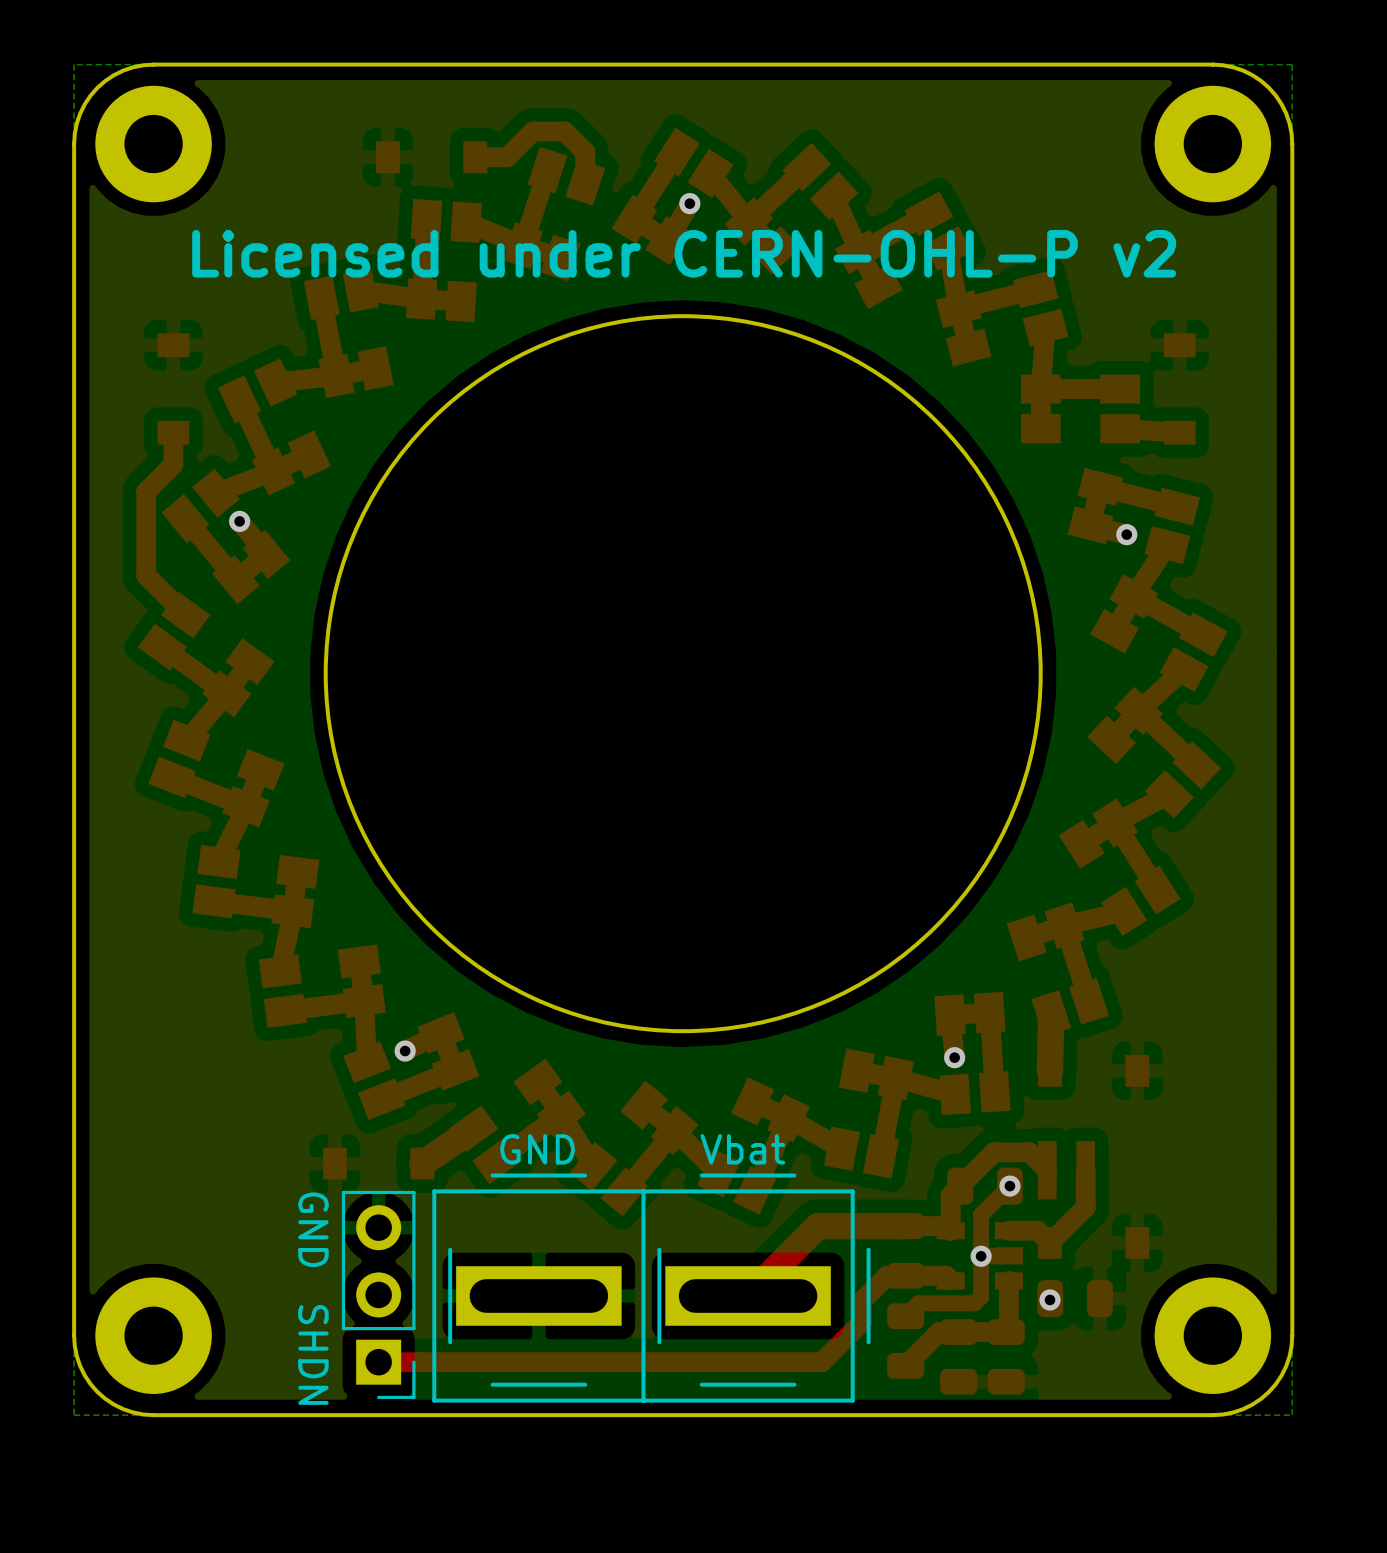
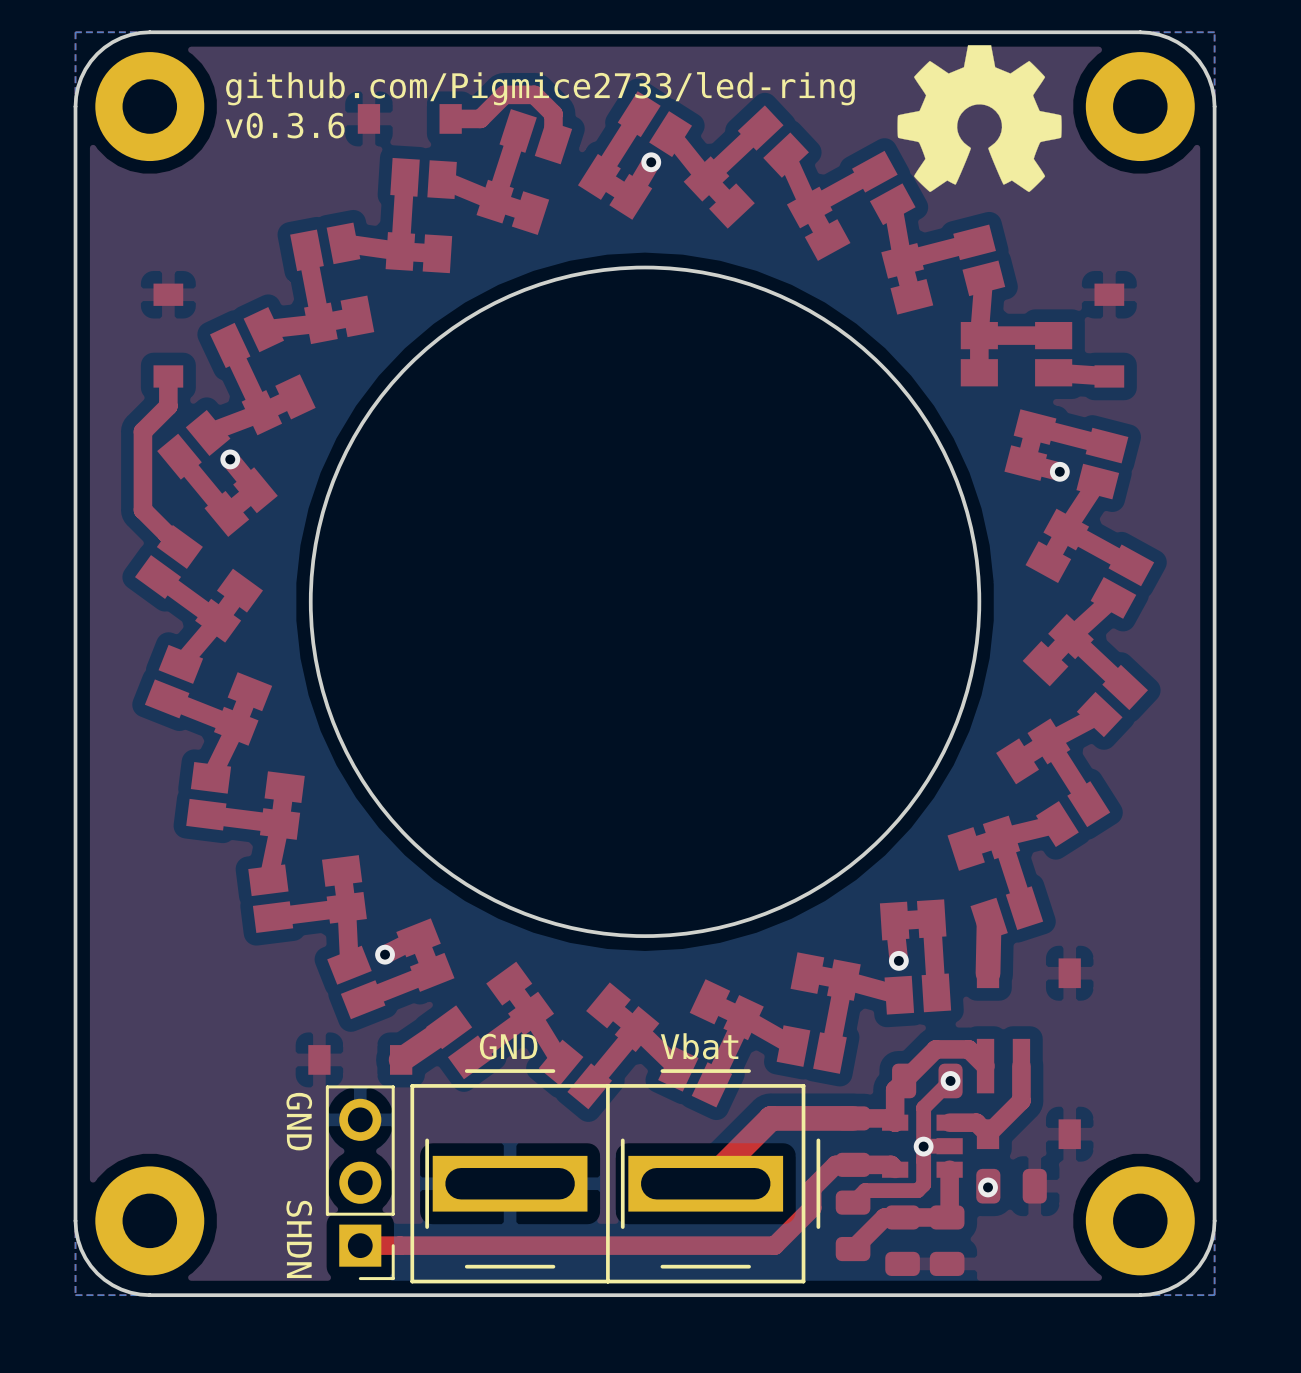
drawing: none -> [897, 45, 1062, 193]
text: none -> github.com/Pigmice2733/led-ring (540, 88)
text: none -> v0.3.6 (285, 125)
text: Licensed under CERN-OHL-P v2 (684, 253) -> none

